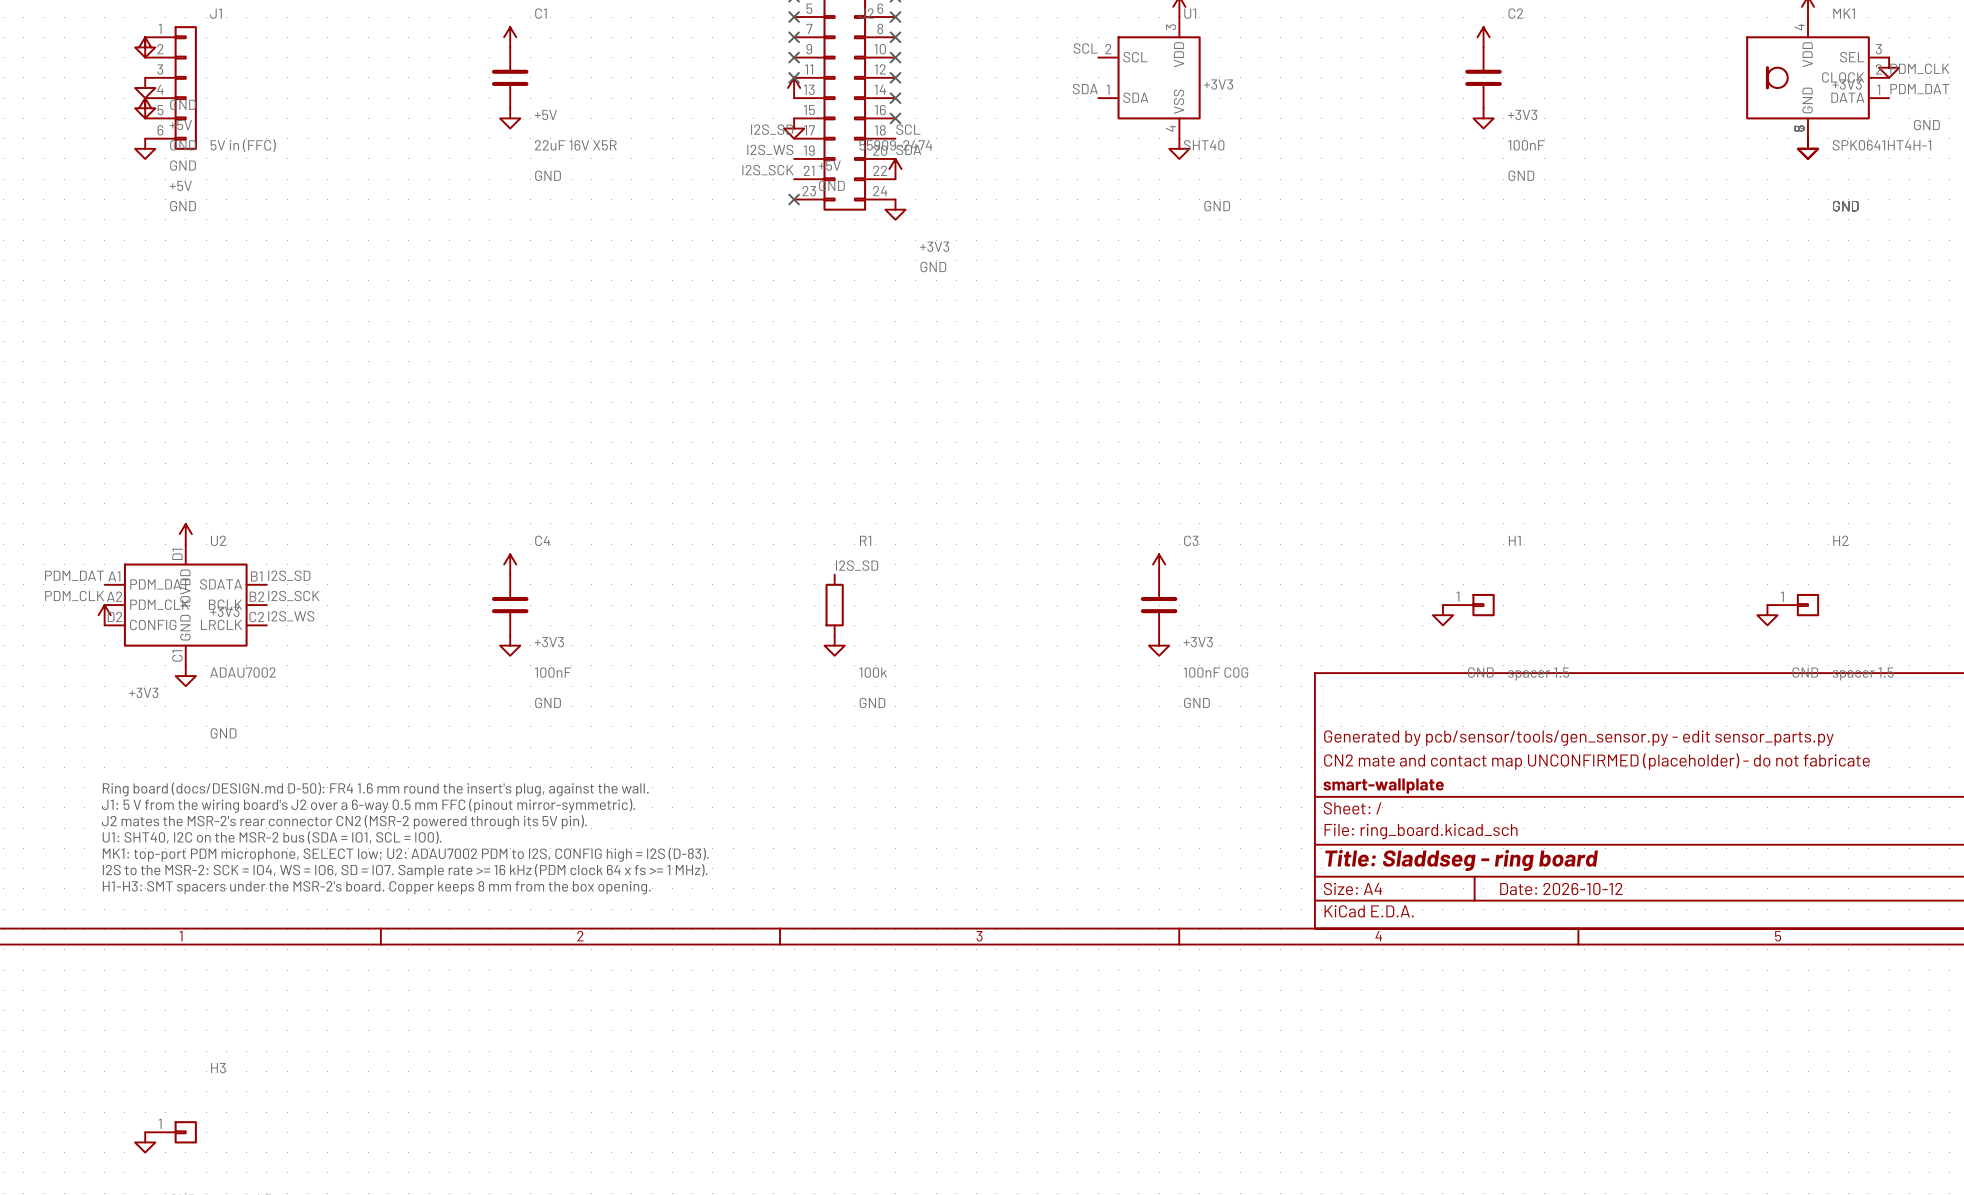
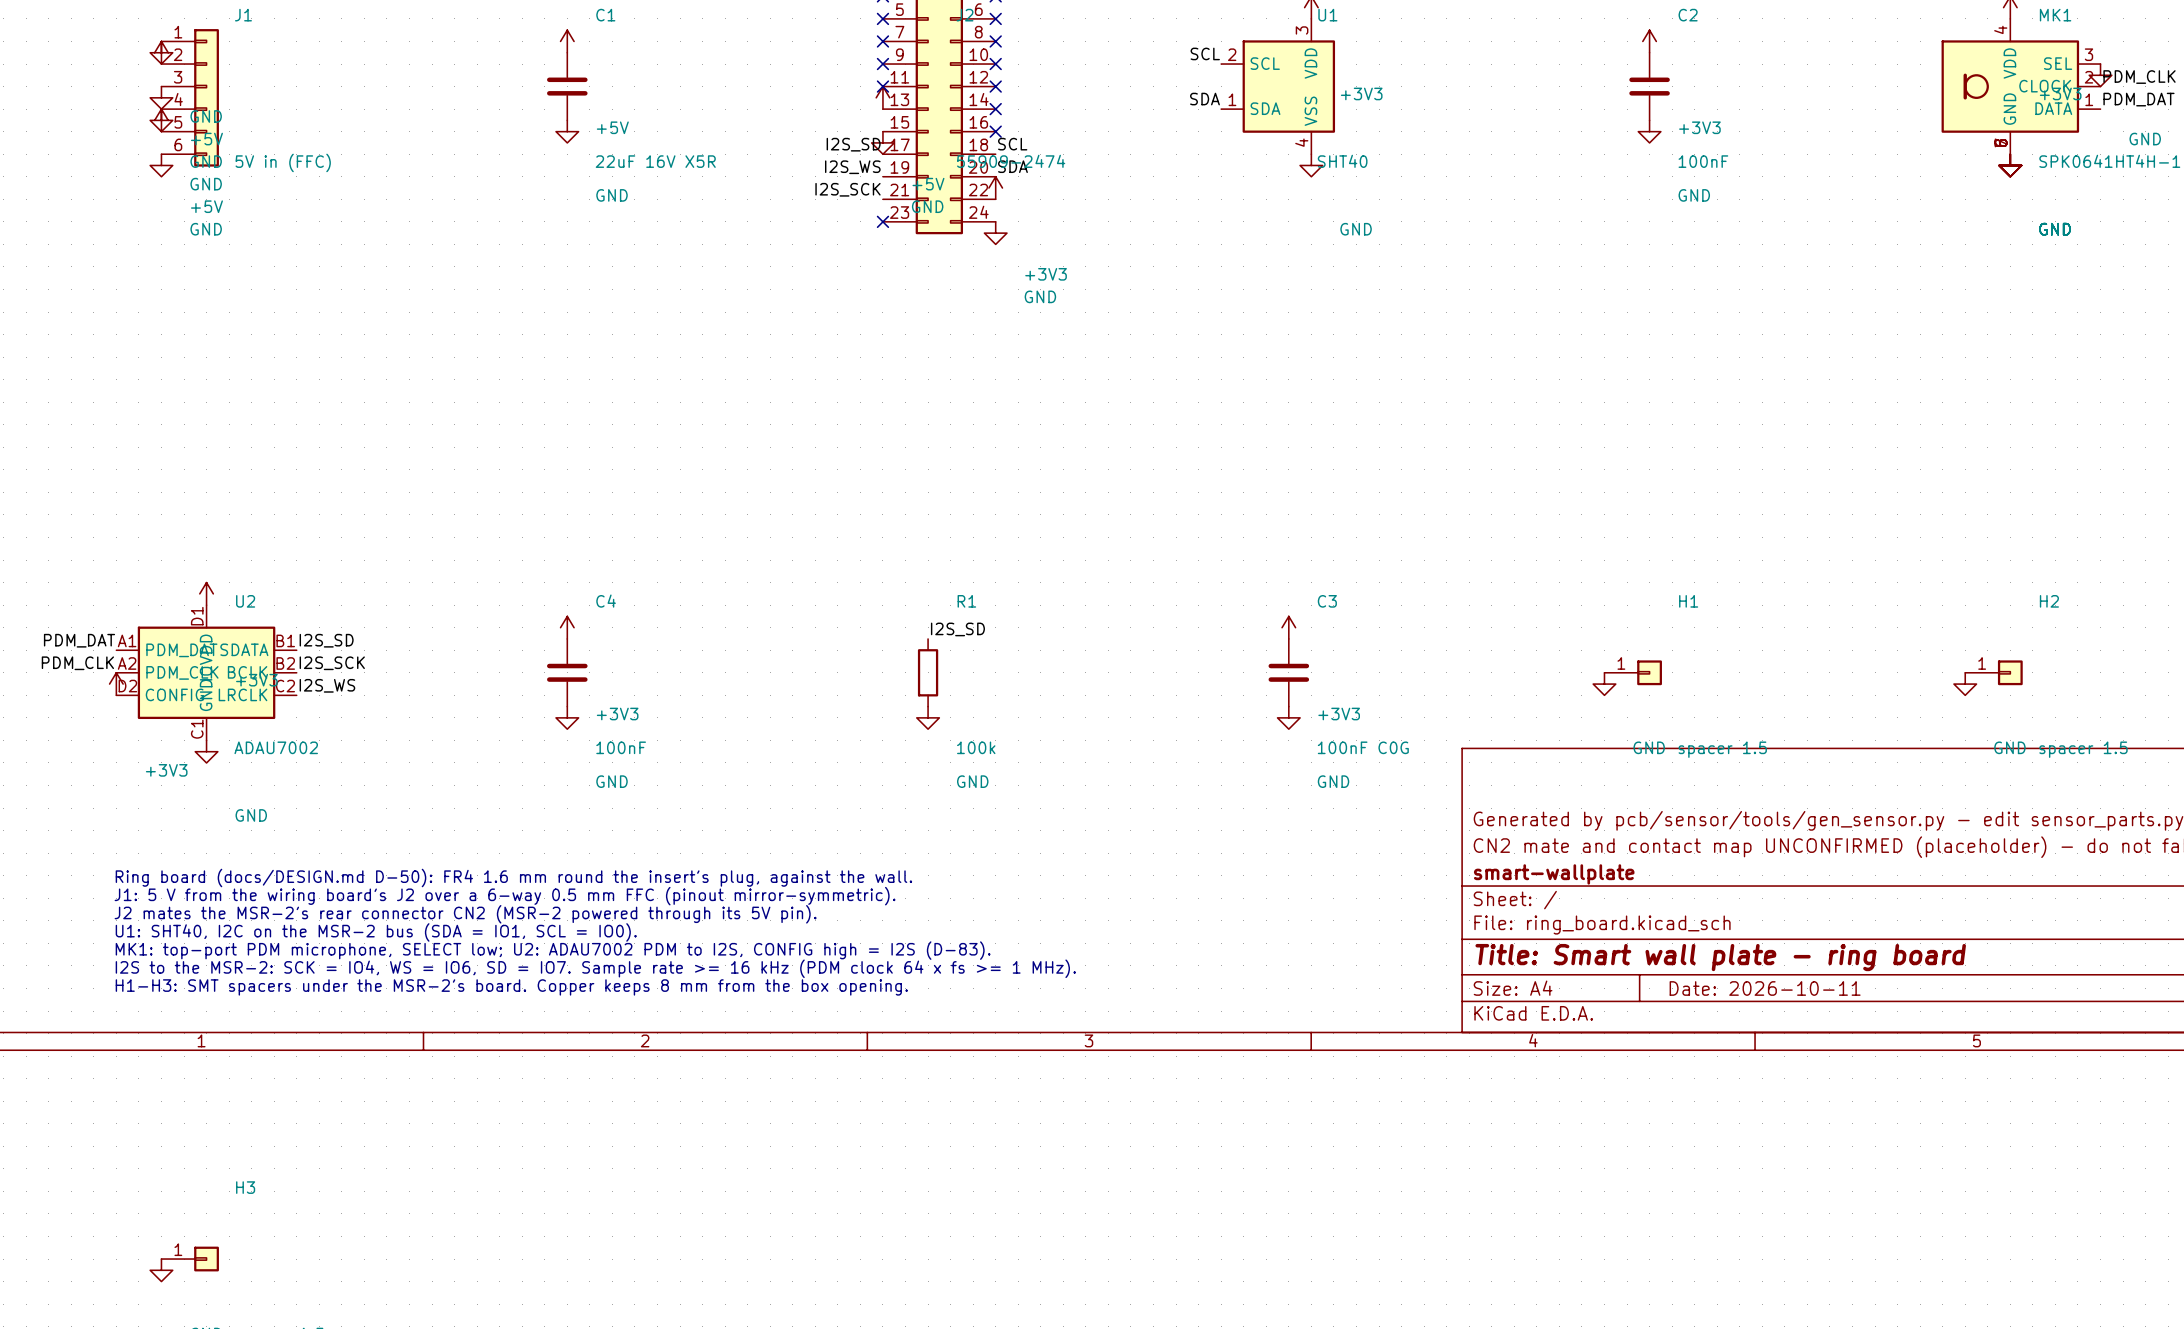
title block: Title: Sladdseg - ring board (1461, 860) -> Title: Smart wall plate - ring board (1720, 957)
title block: Date: 2026-10-12 (1561, 889) -> Date: 2026-10-11 (1765, 988)

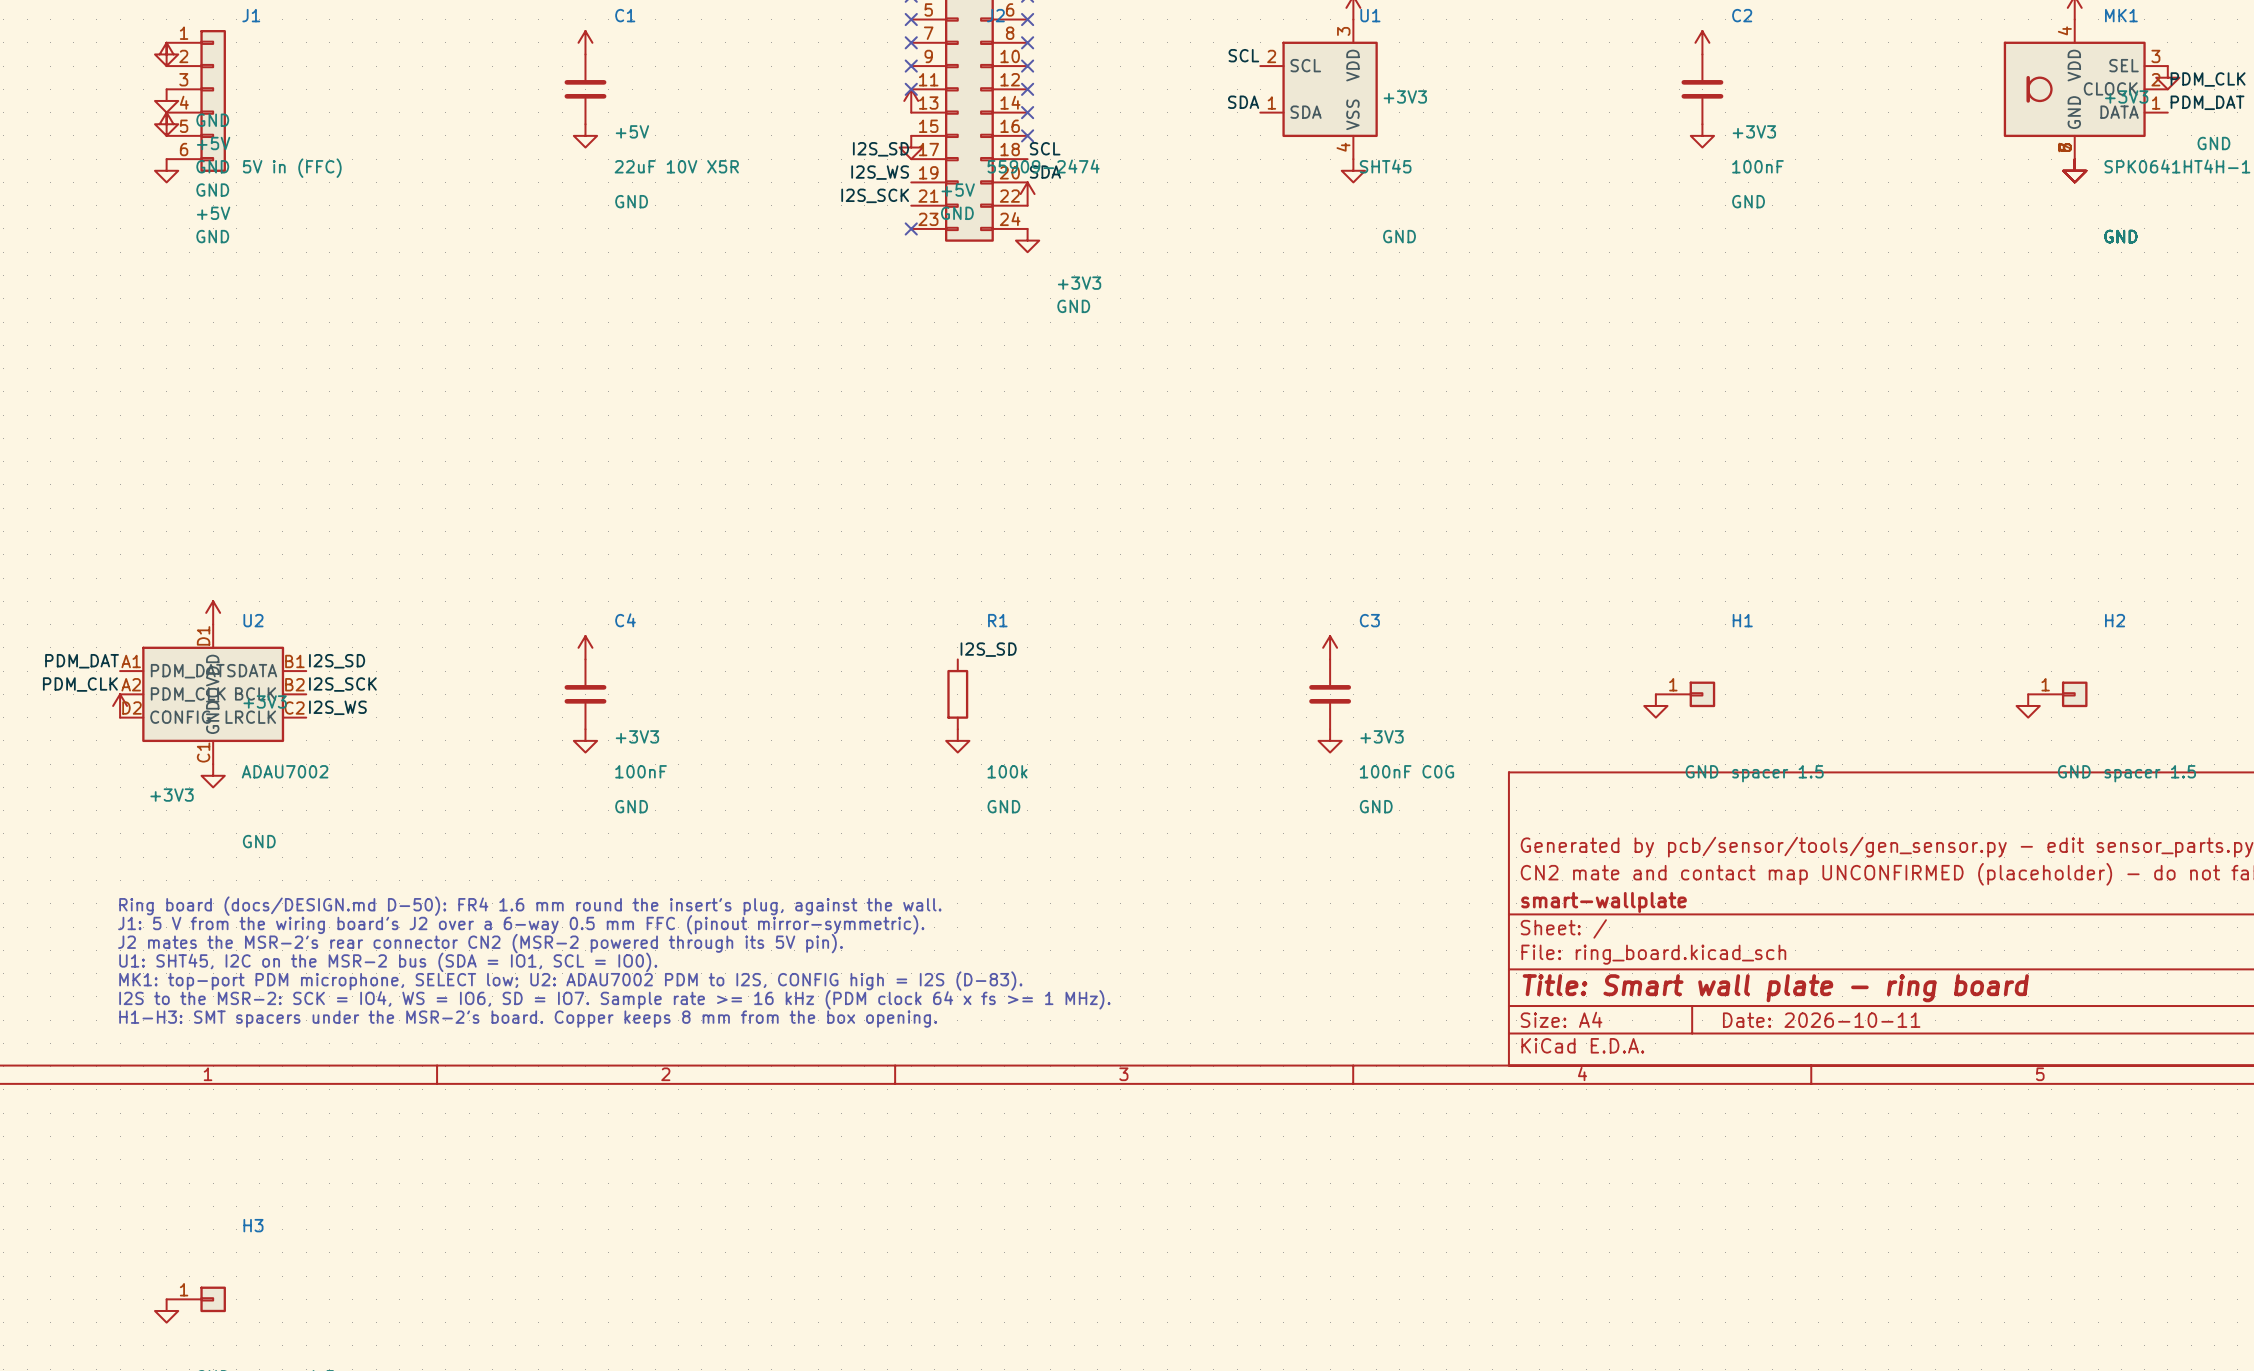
C1 value: 22uF 16V X5R (655, 161) -> 22uF 10V X5R (676, 166)
U1 value: SHT40 (1342, 161) -> SHT45 (1385, 166)
text: U1: SHT40, I2C on the MSR-2 bus (SDA = IO1, SCL = IO0). (376, 932) -> U1: SHT45, I2C on the MSR-2 bus (SDA = IO1, SCL = IO0). (388, 962)

